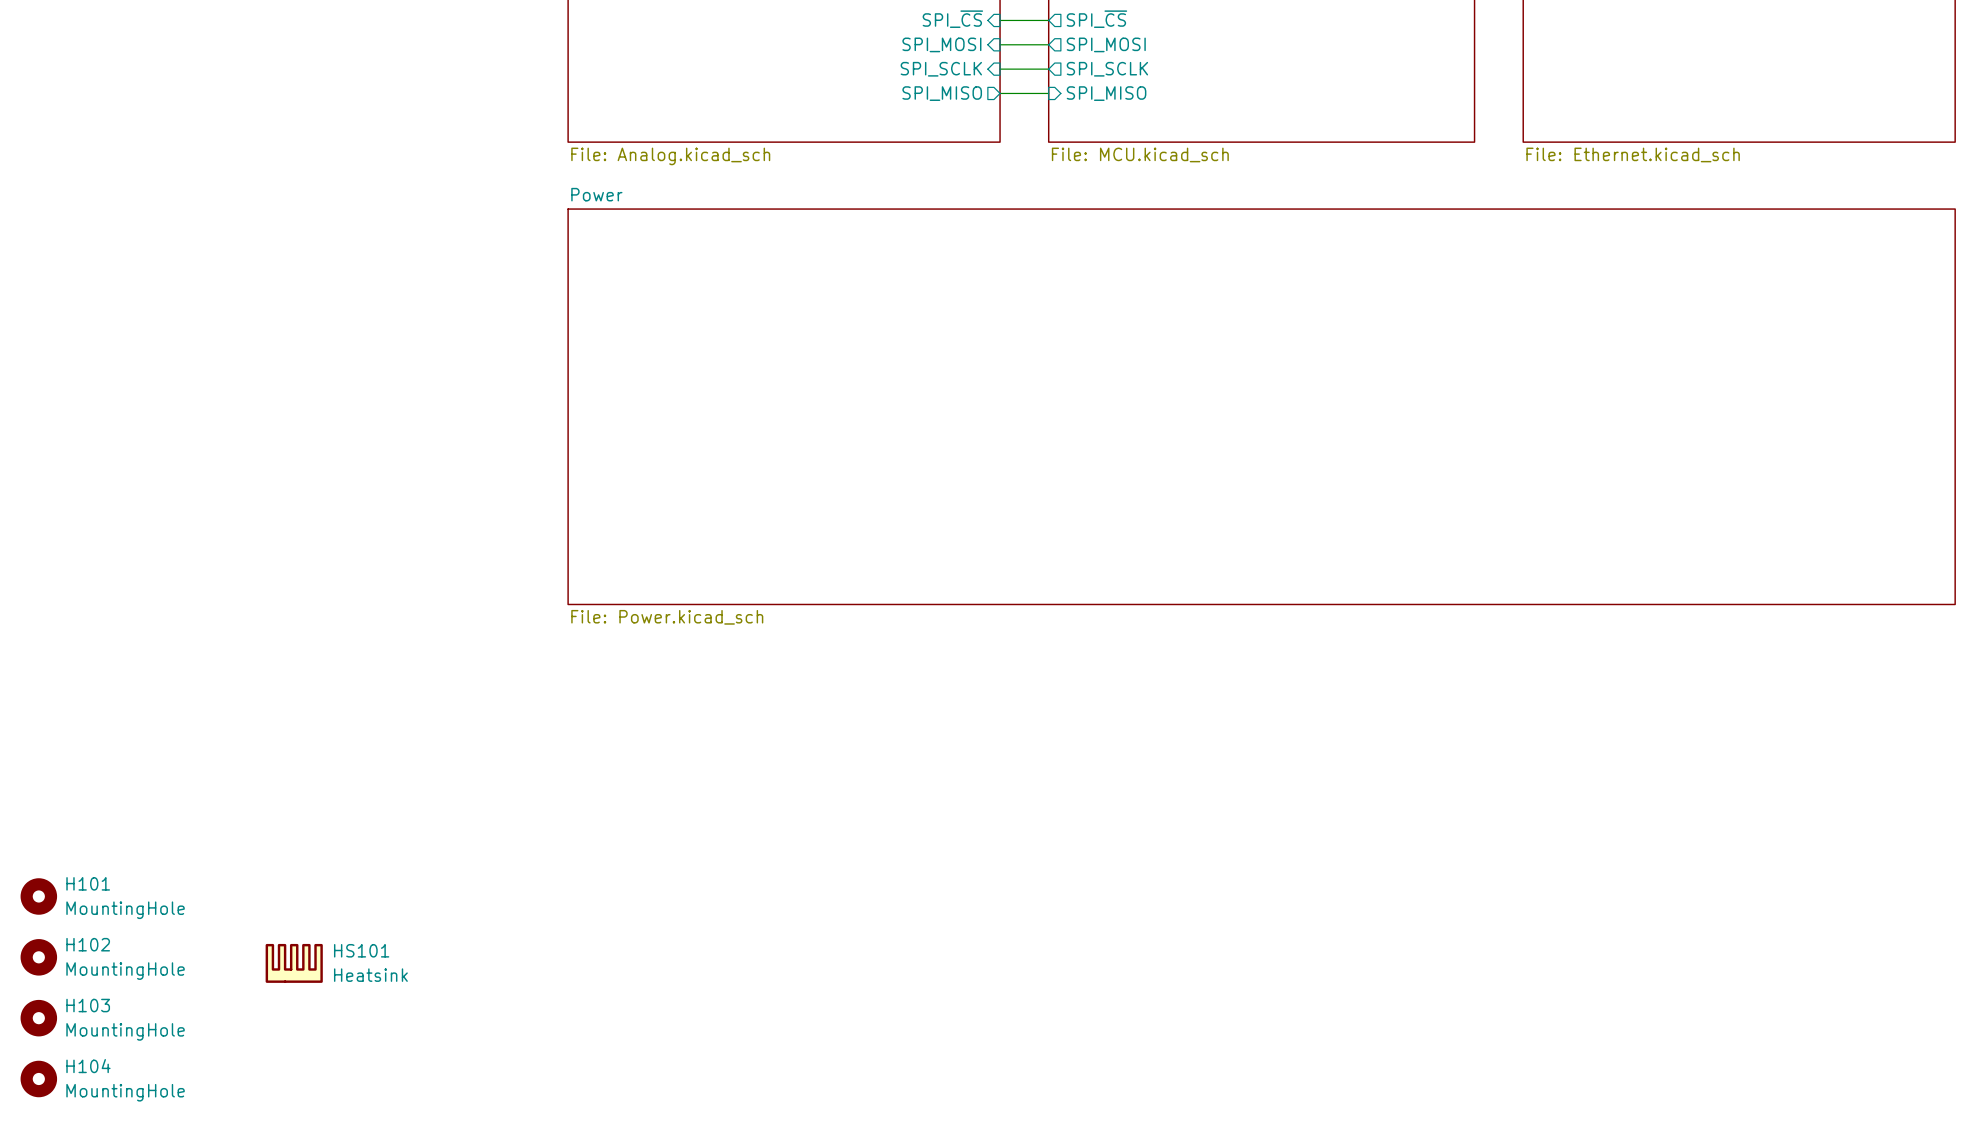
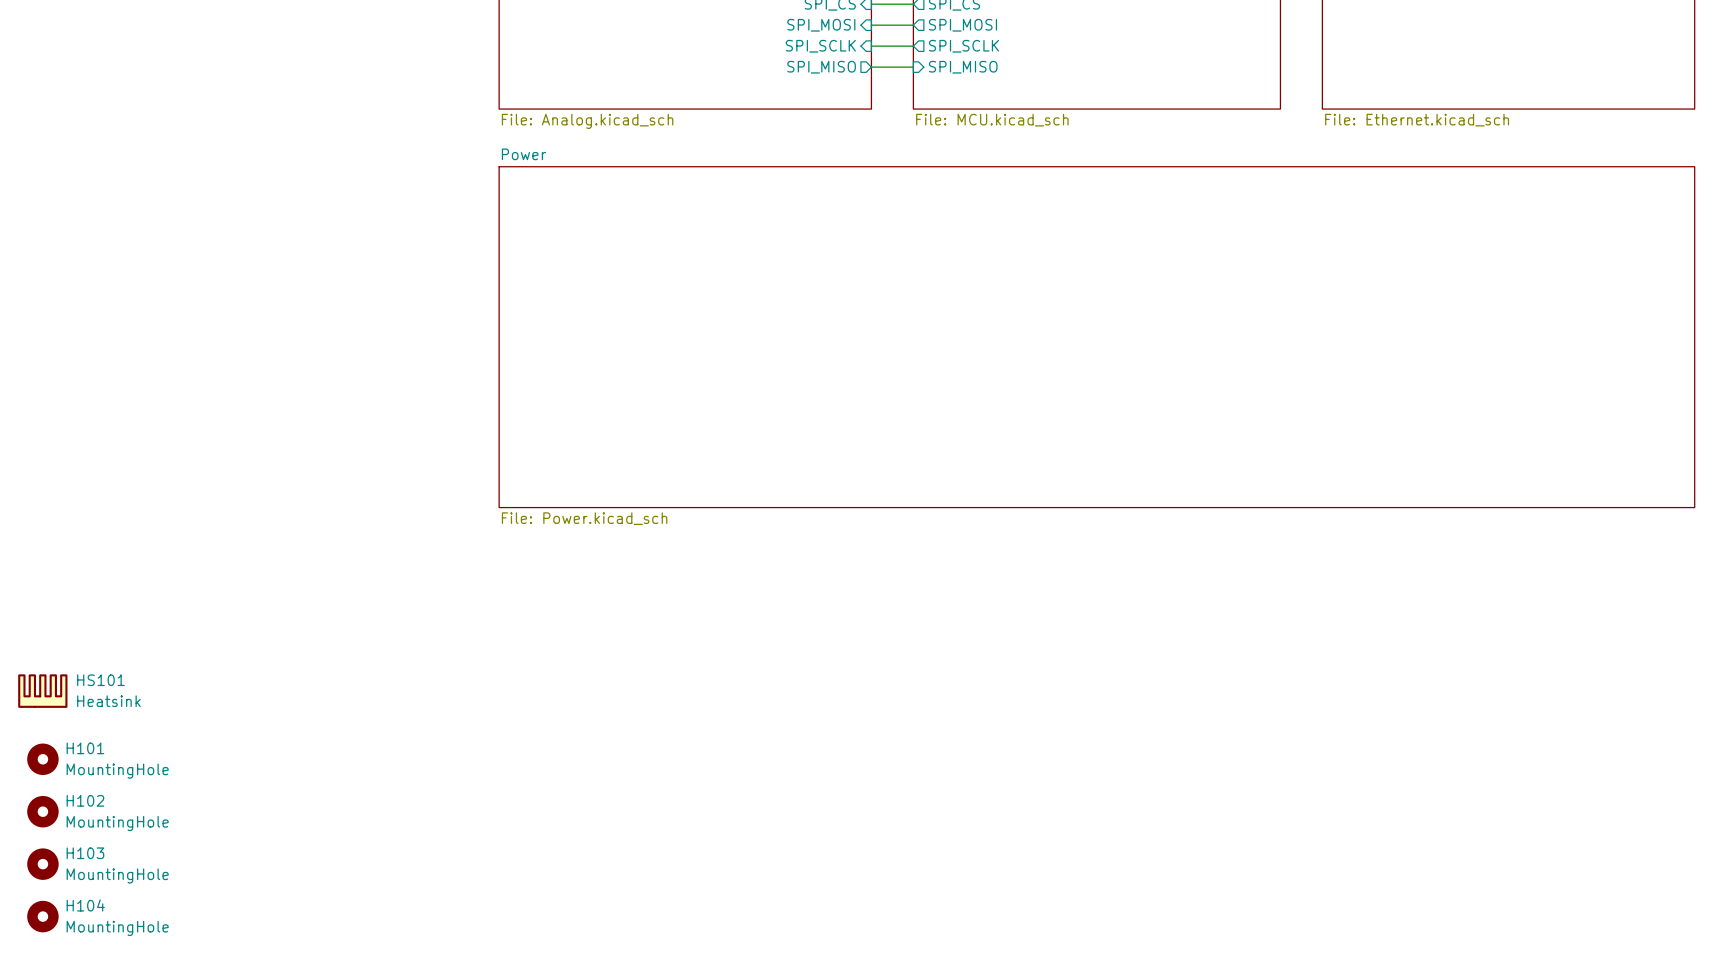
HS101 position: (294, 963) -> (42, 691)

